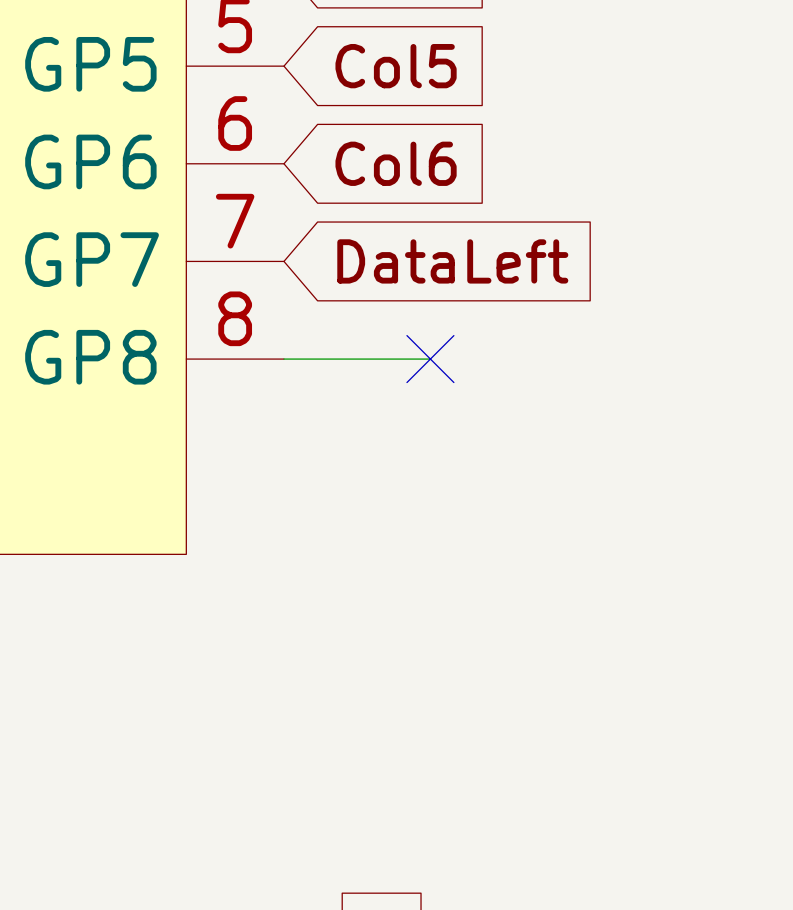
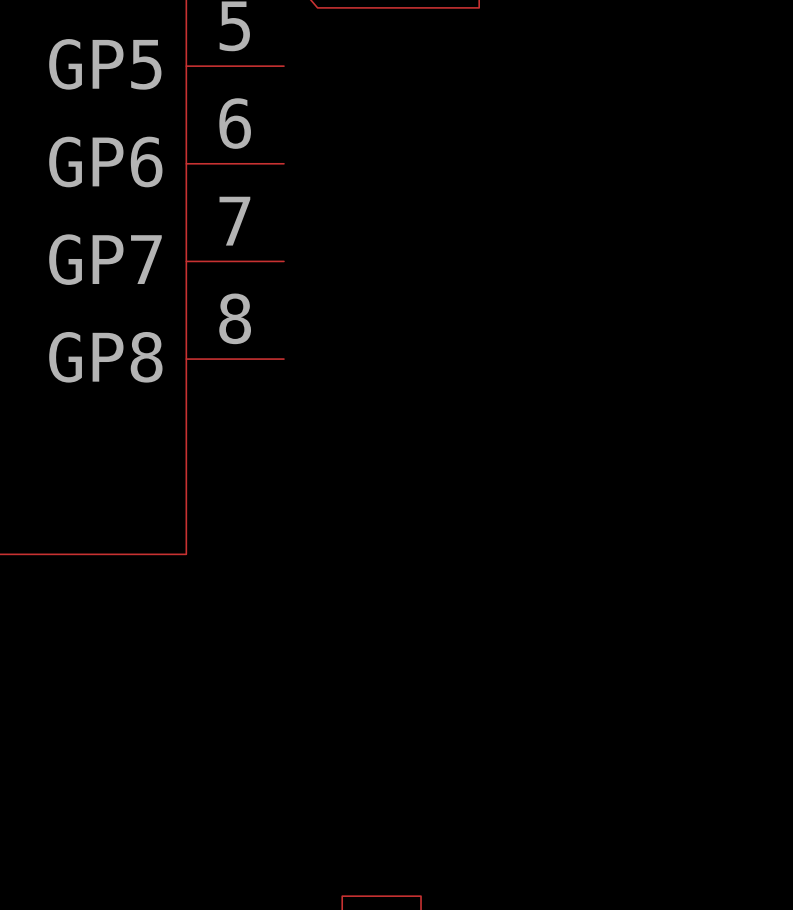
global label: Col5 (396, 66) -> none
global label: Col6 (396, 163) -> none
global label: DataLeft (452, 261) -> none
wire: (283, 359) (430, 359) -> none
no-connect mark: (430, 359) -> none

